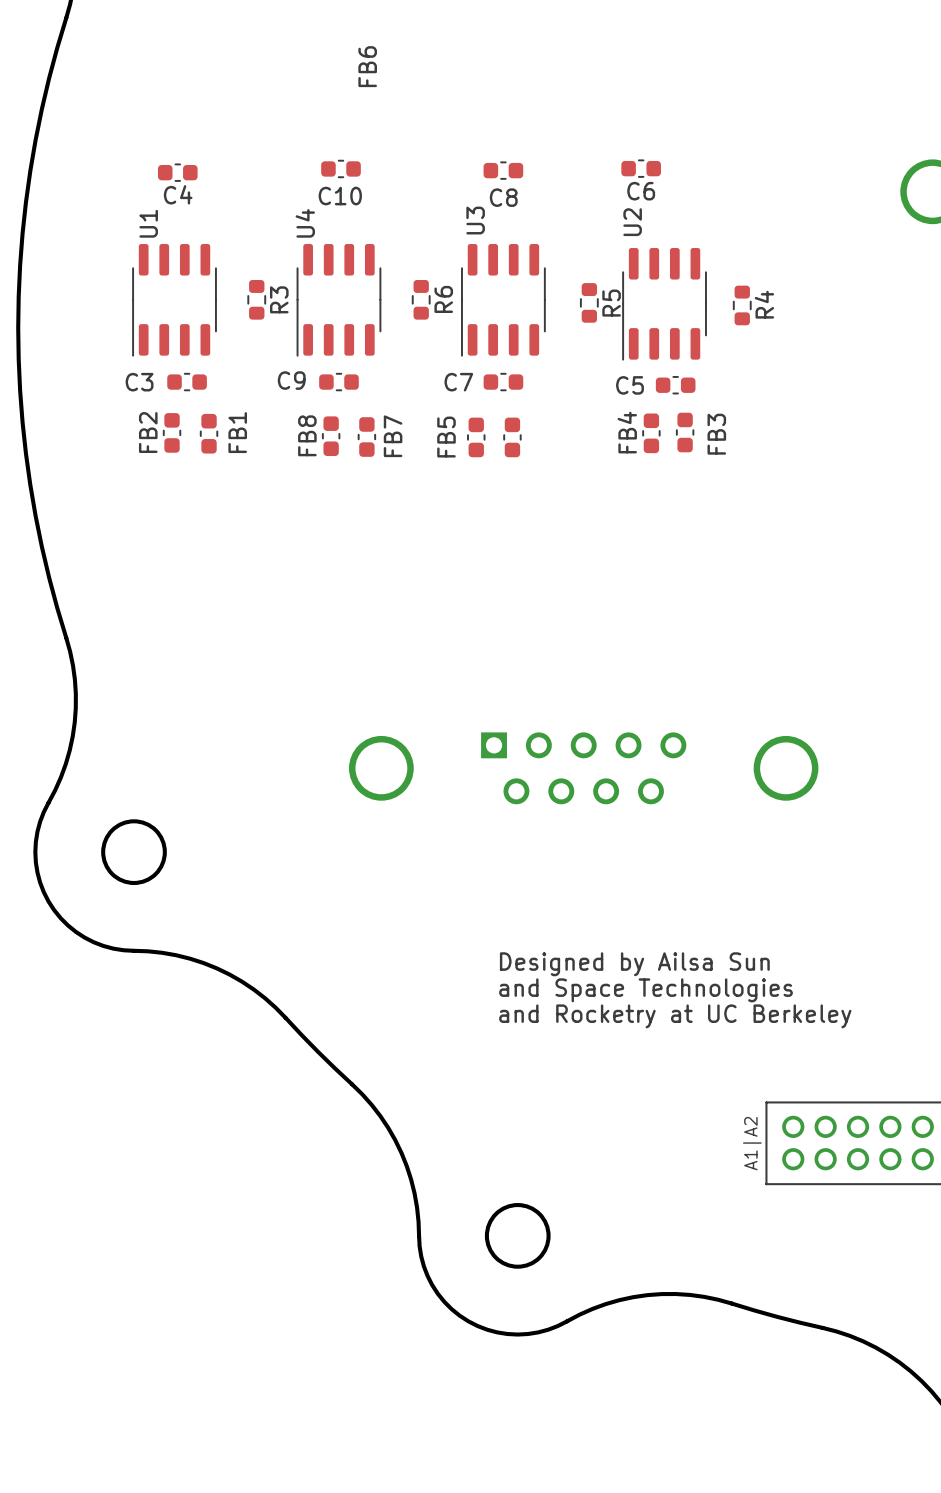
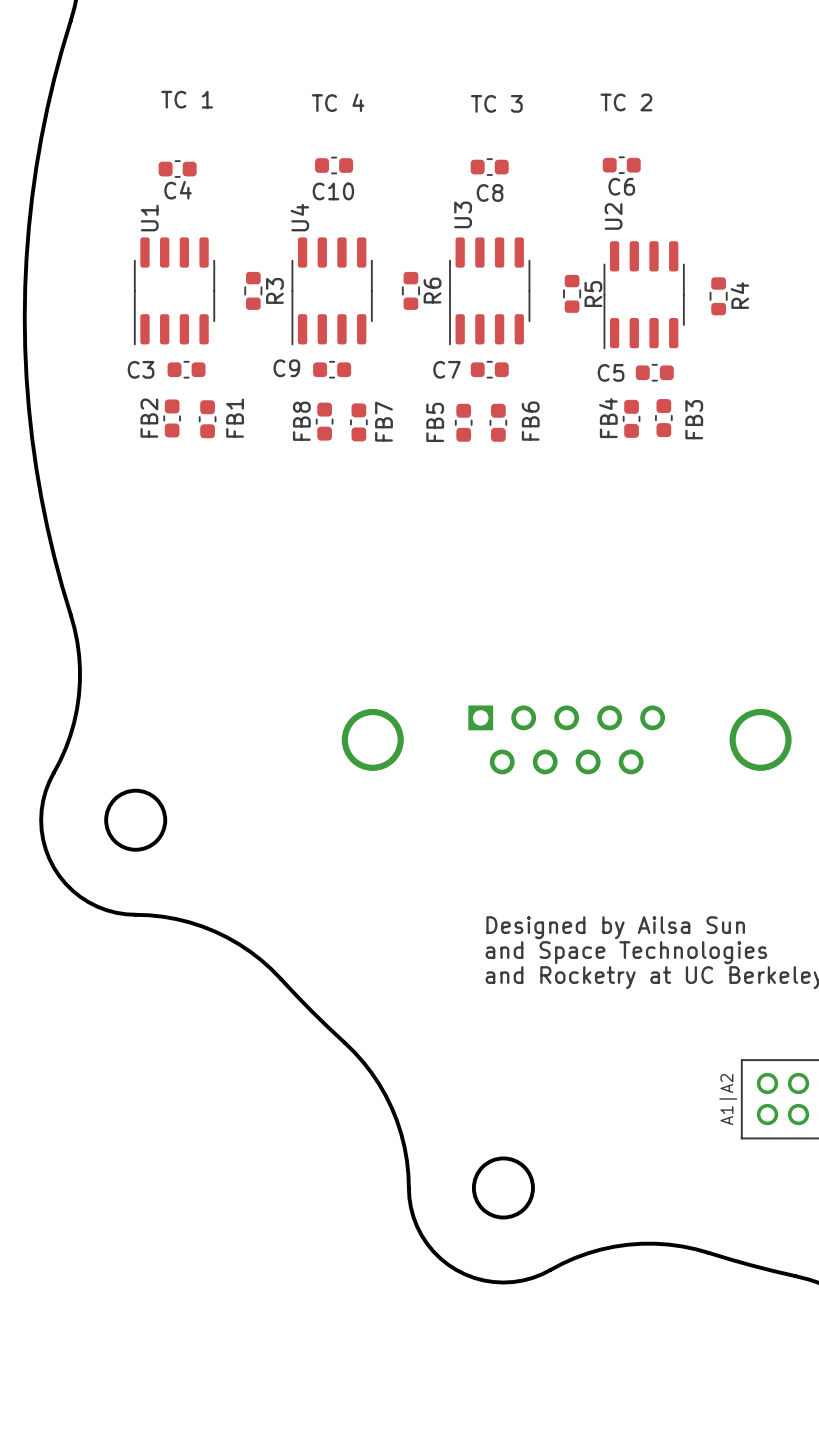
FB6 name position: FB6 (367, 66) -> FB6 (530, 421)
text: none -> TC 1 (187, 99)
text: none -> TC 4 (338, 102)
text: none -> TC 2 (626, 102)
text: none -> TC 3 (496, 103)

